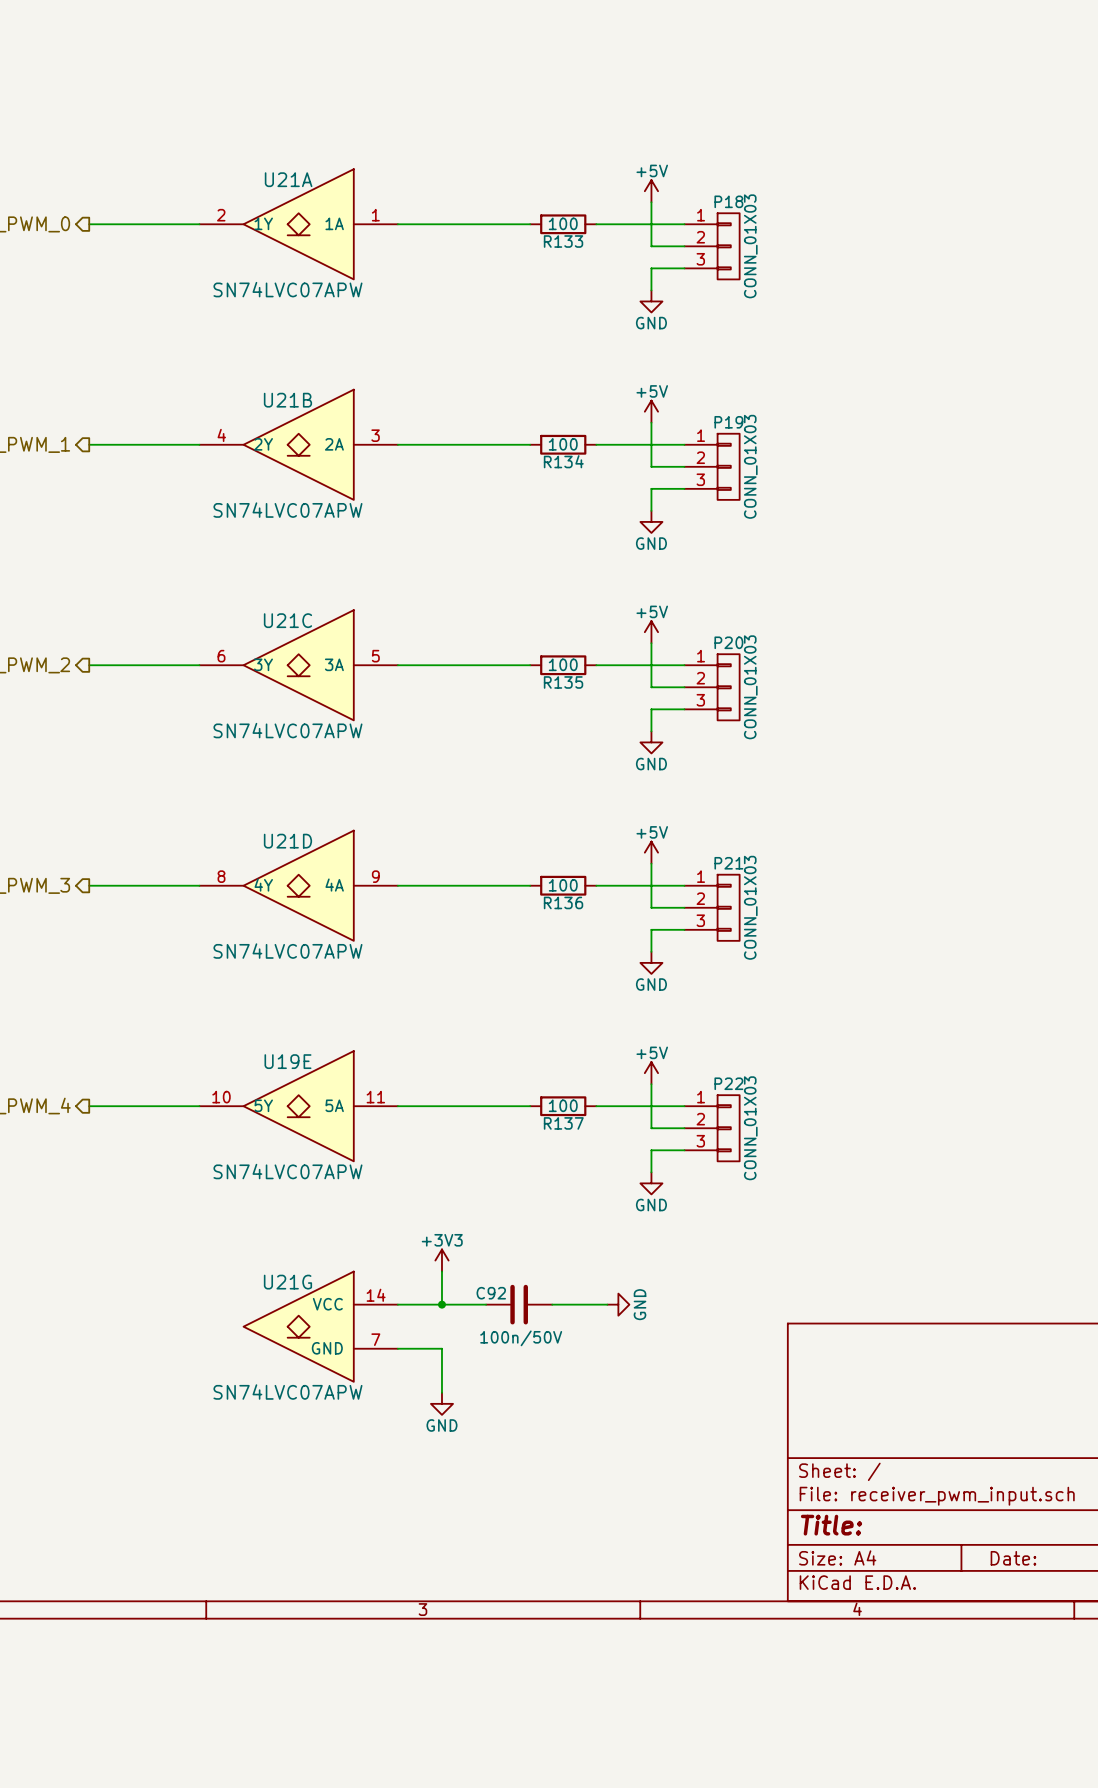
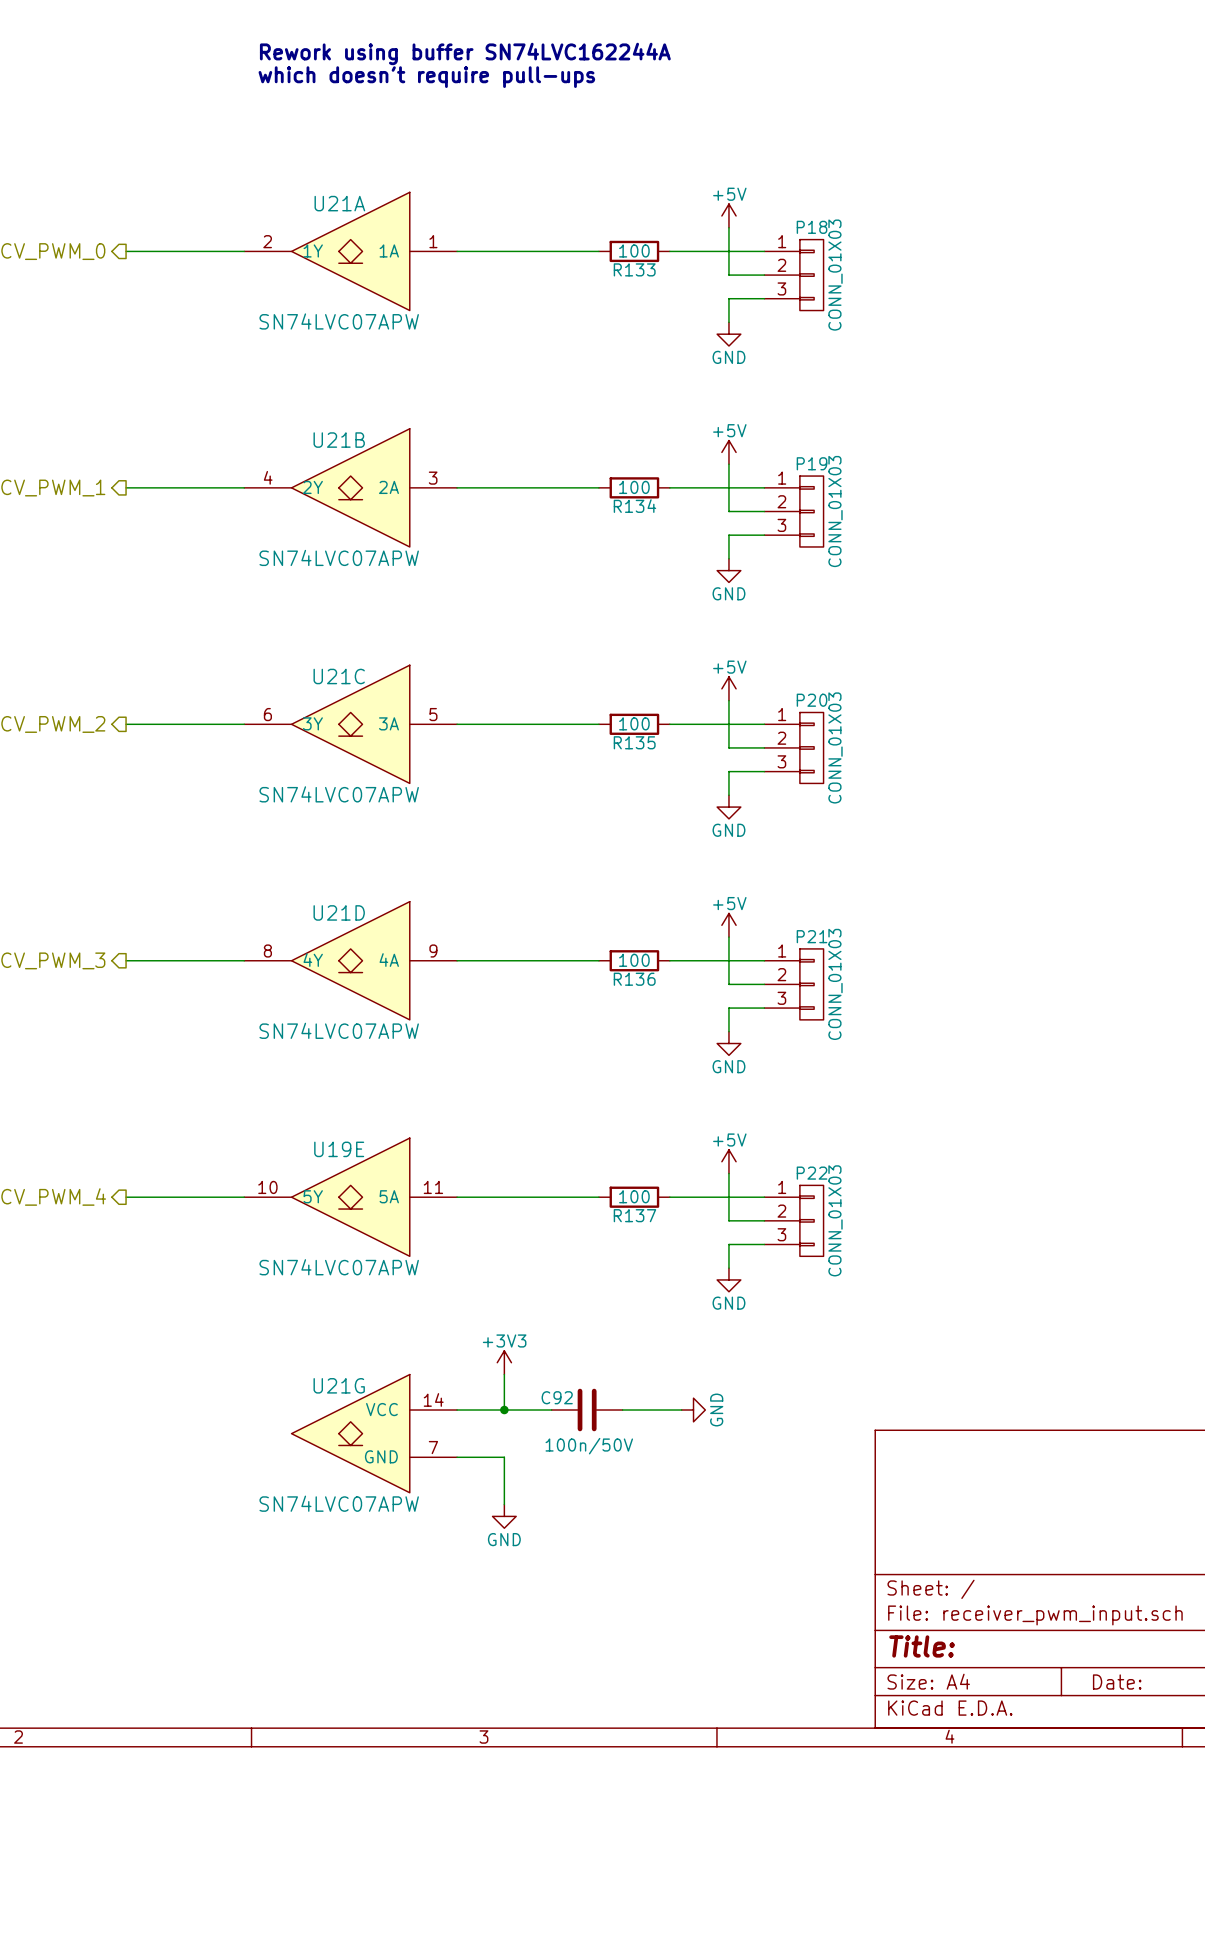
text: none -> Rework using buffer SN74LVC162244A (465, 53)
text: none -> which doesn't require pull-ups (426, 77)

